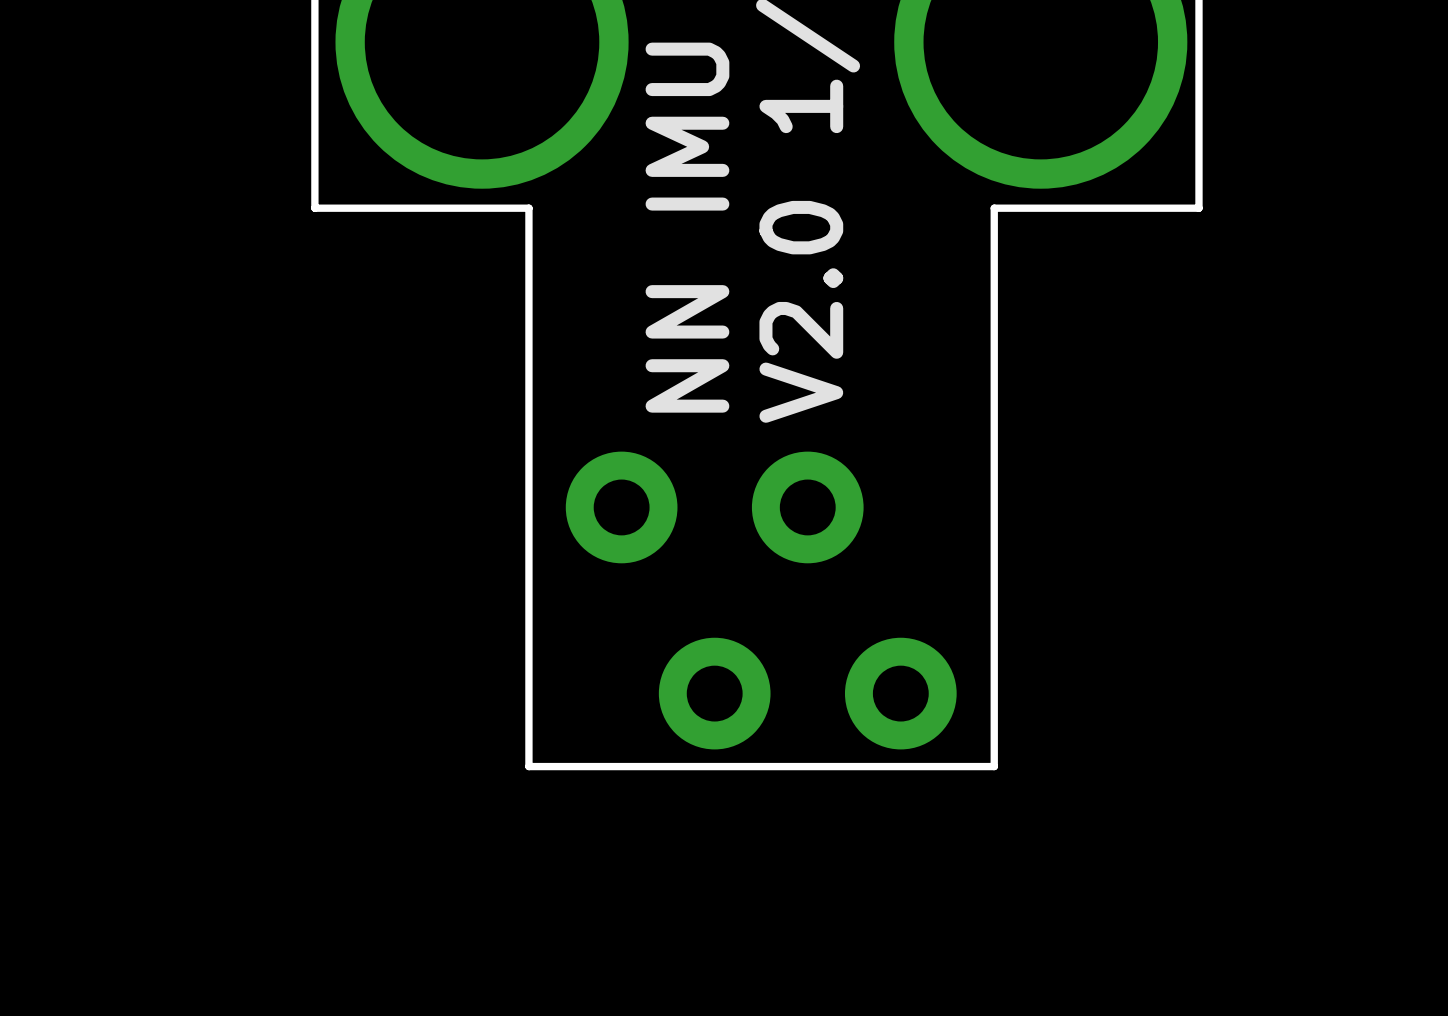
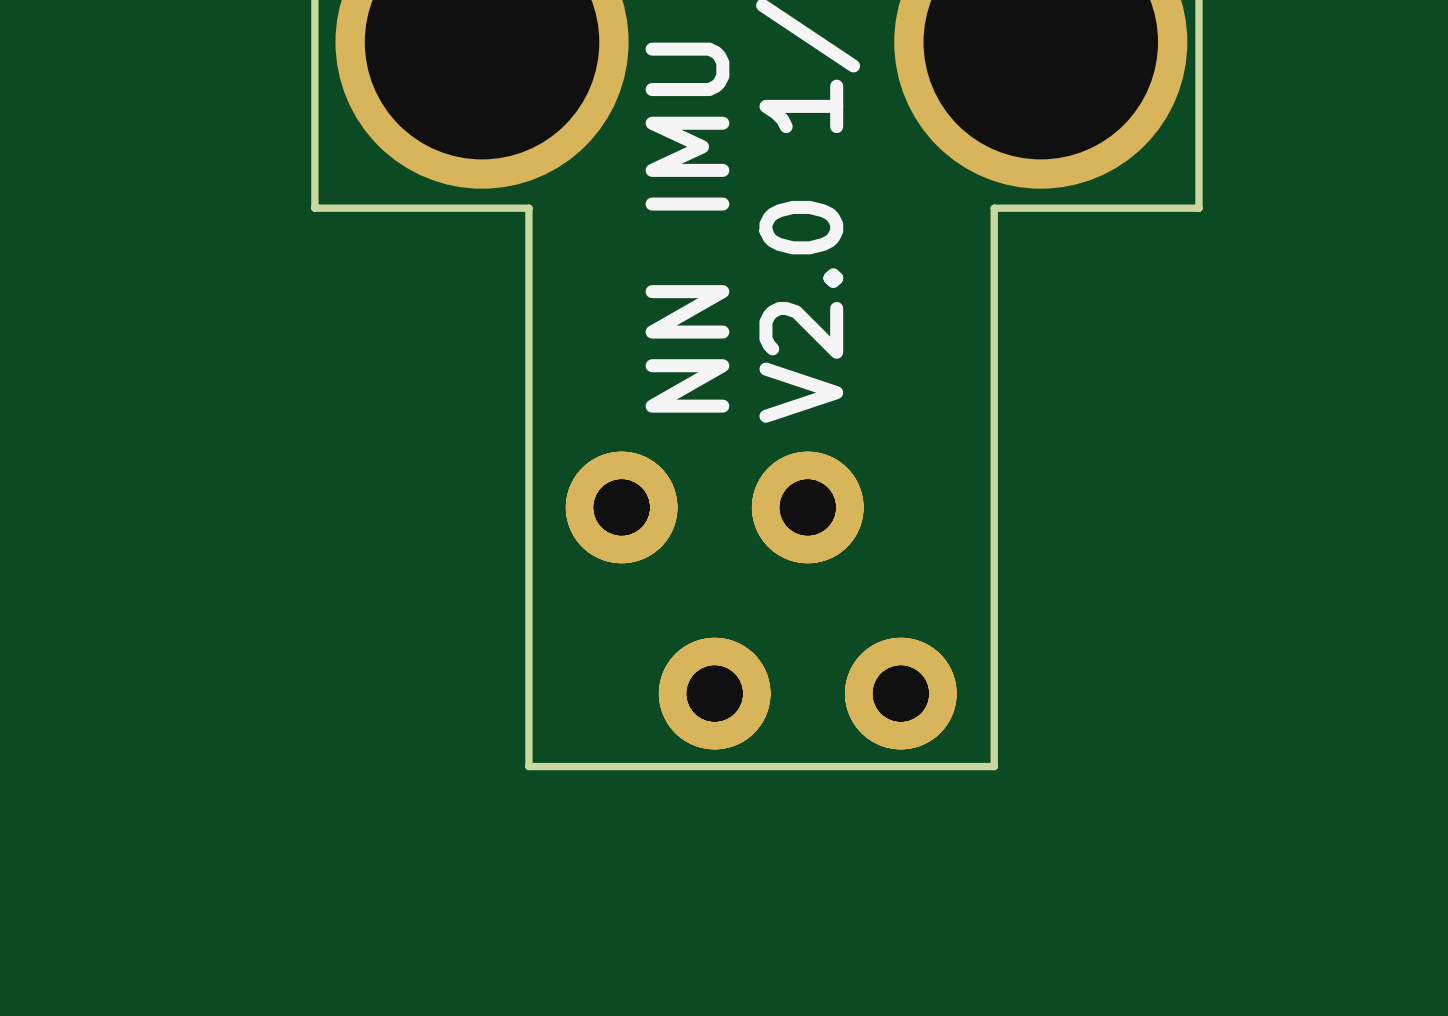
part: none -> (761, 600)

